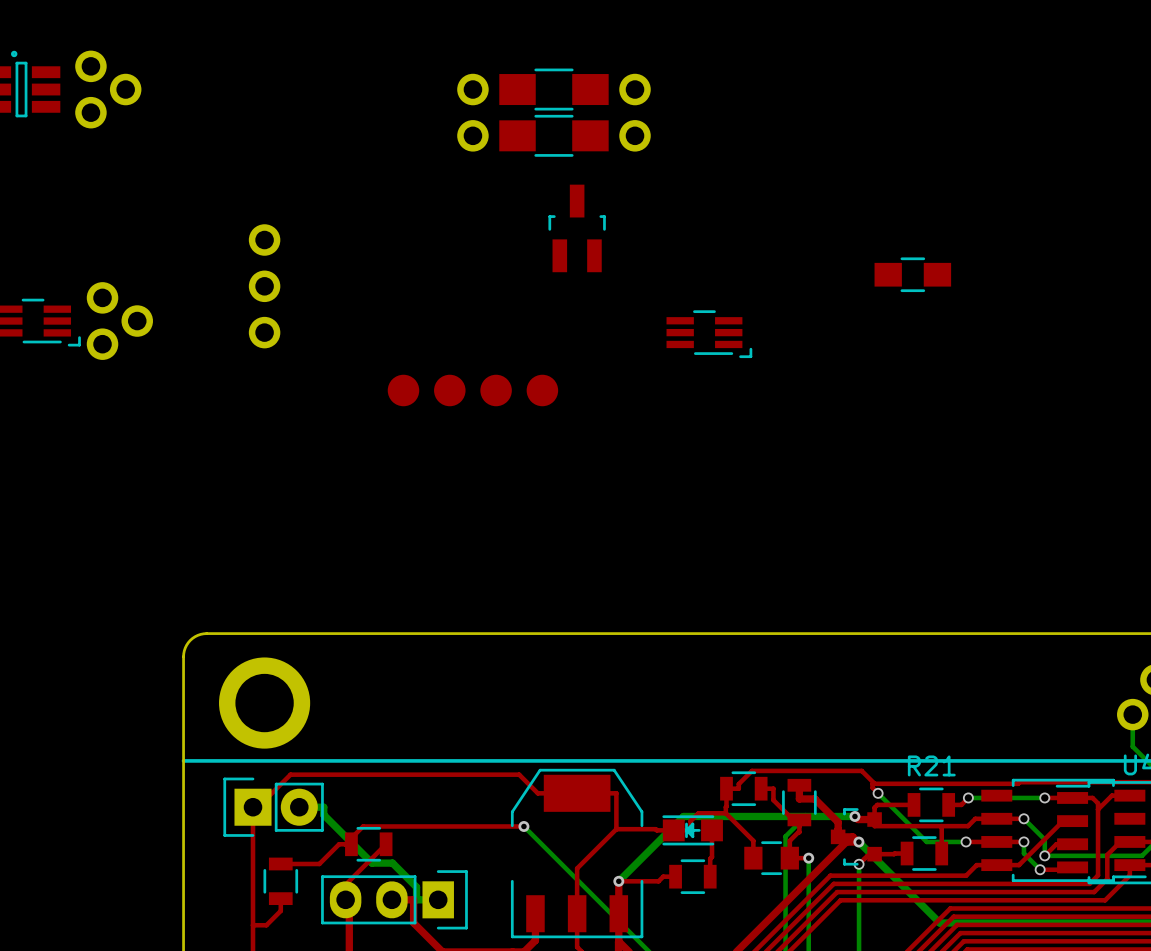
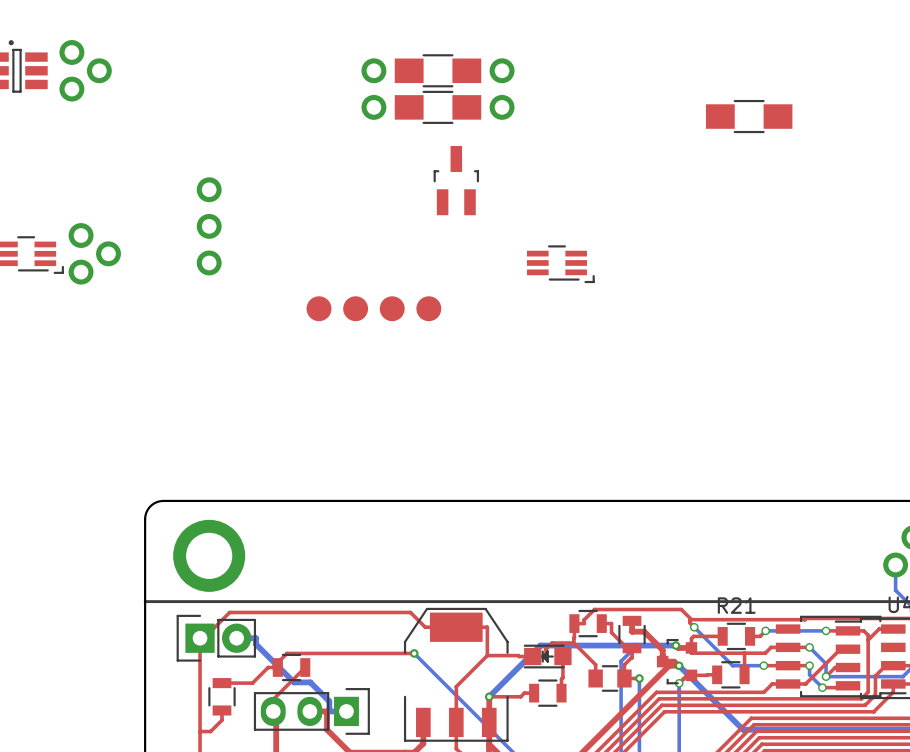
part: none -> (749, 116)
part: (912, 274) -> none

